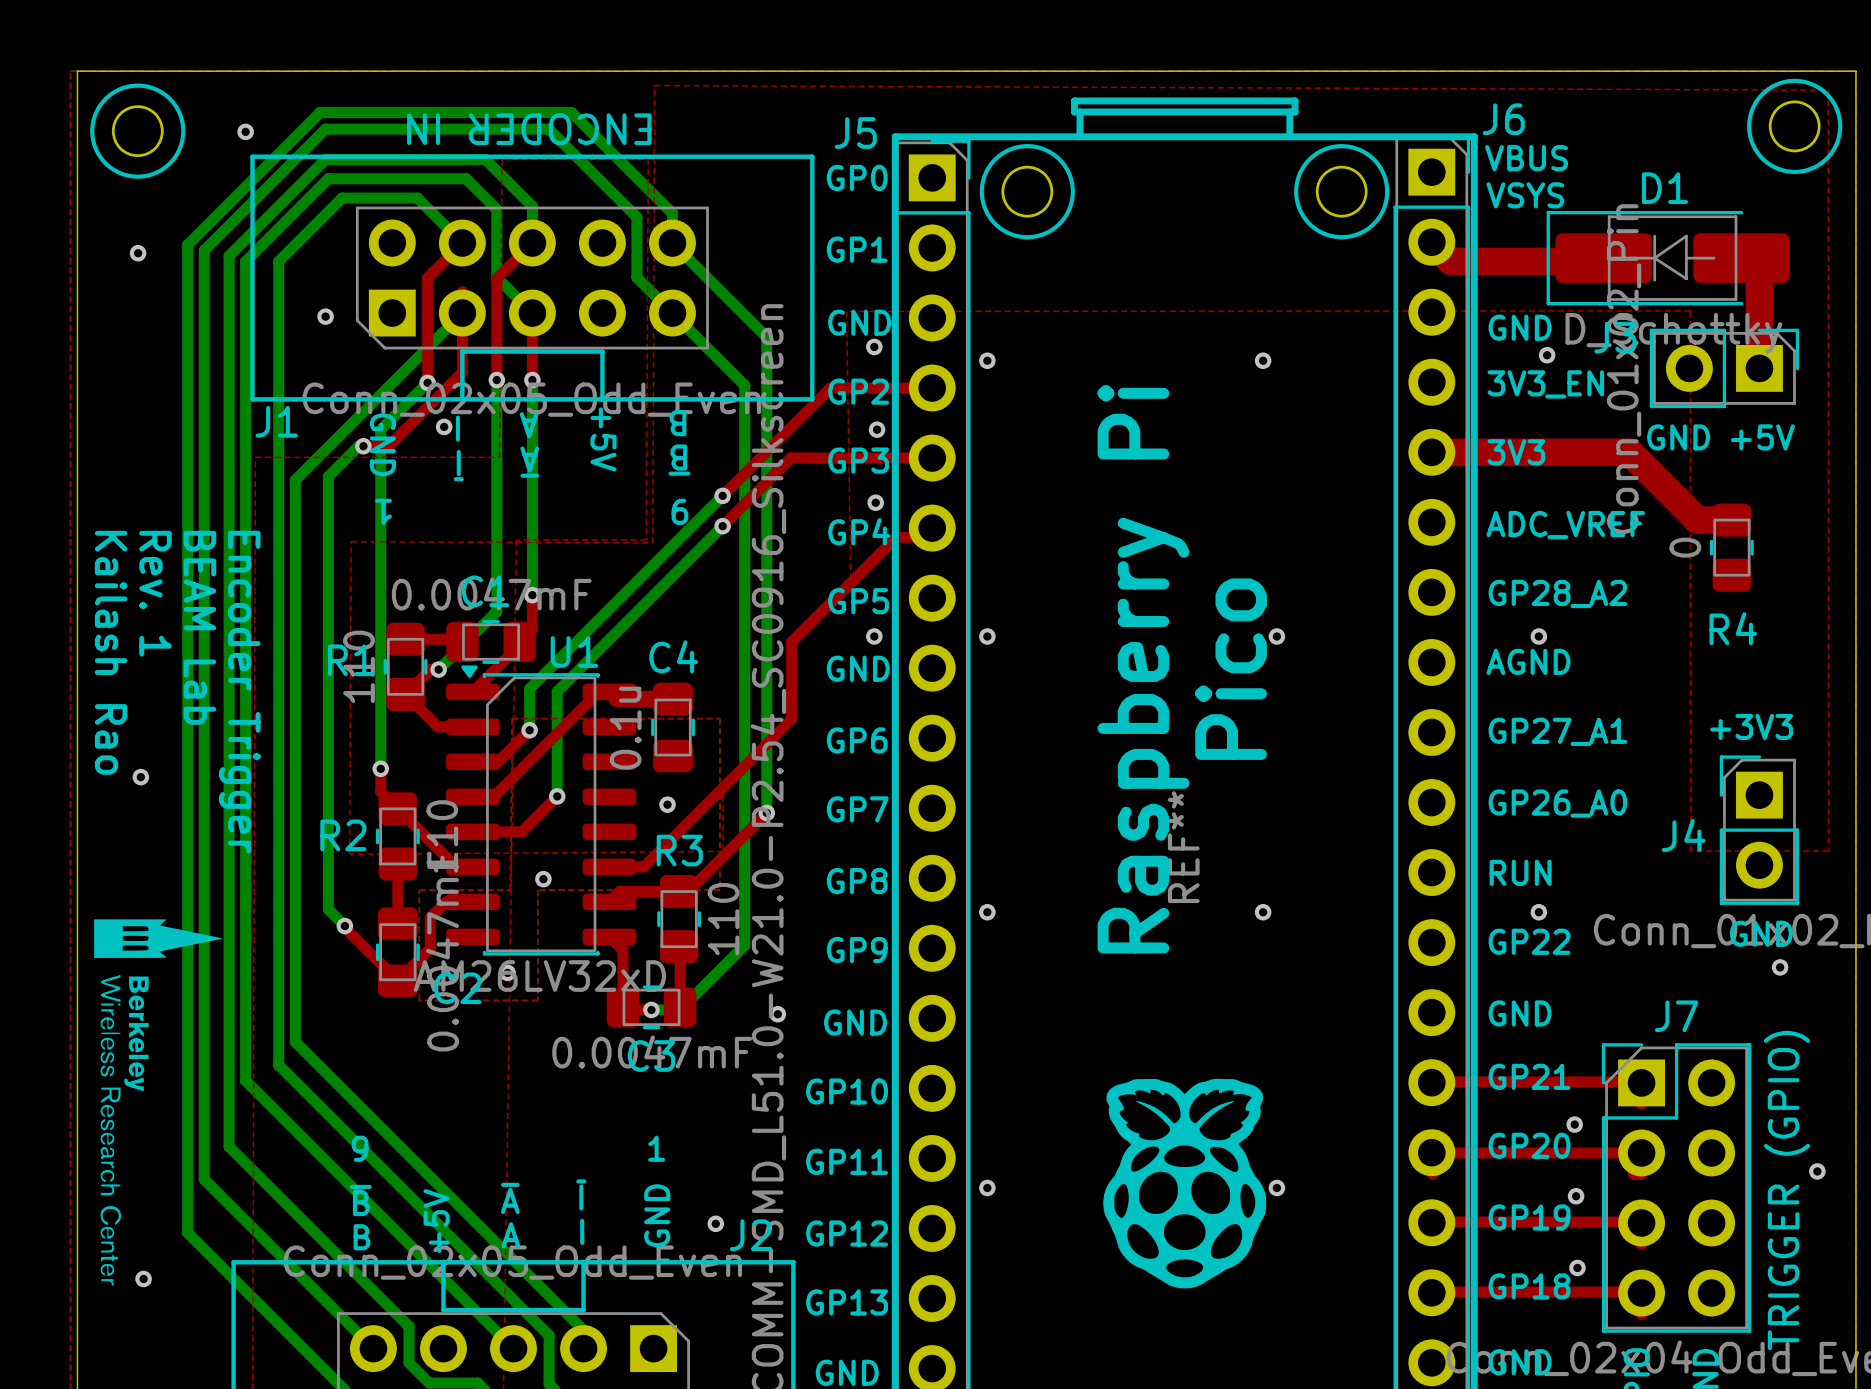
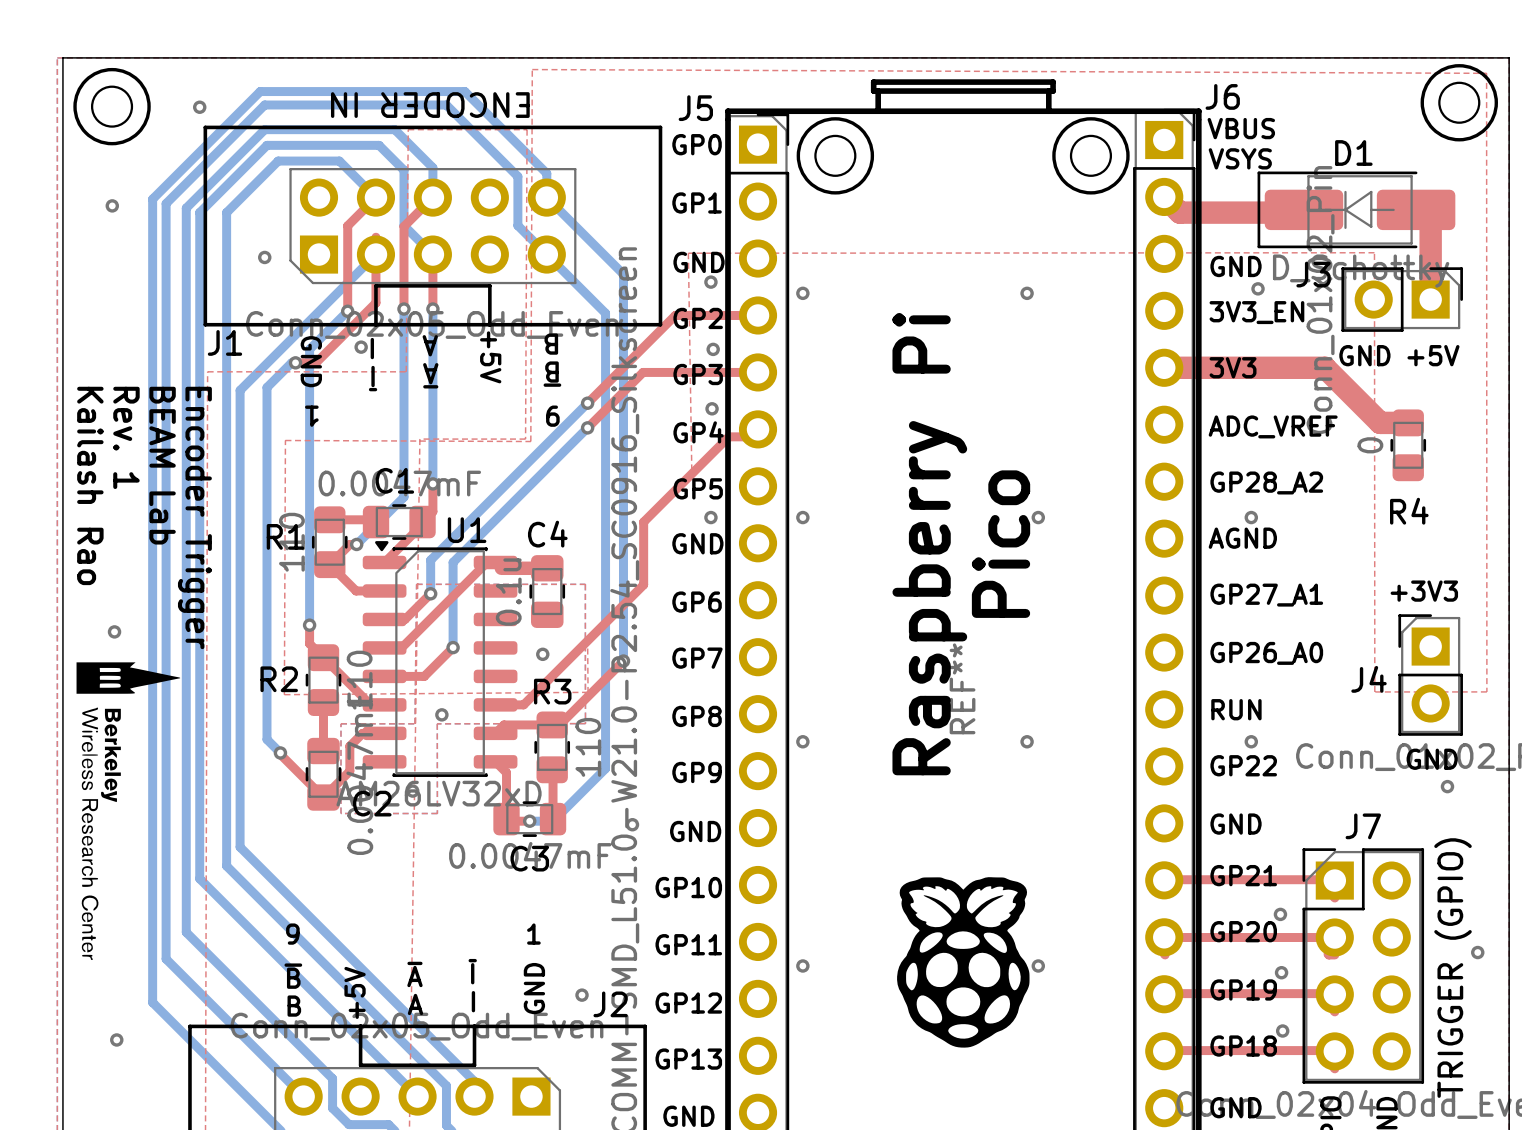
text position: Rev. 1 (155, 593) -> Rev. 1 (126, 437)
text position: BEAM Lab (199, 627) -> BEAM Lab (162, 465)
text position: Kailash Rao (111, 652) -> Kailash Rao (90, 485)
text position: Encoder Trigger (239, 692) -> Encoder Trigger (194, 517)
drawing position: (157, 1102) -> (128, 811)

